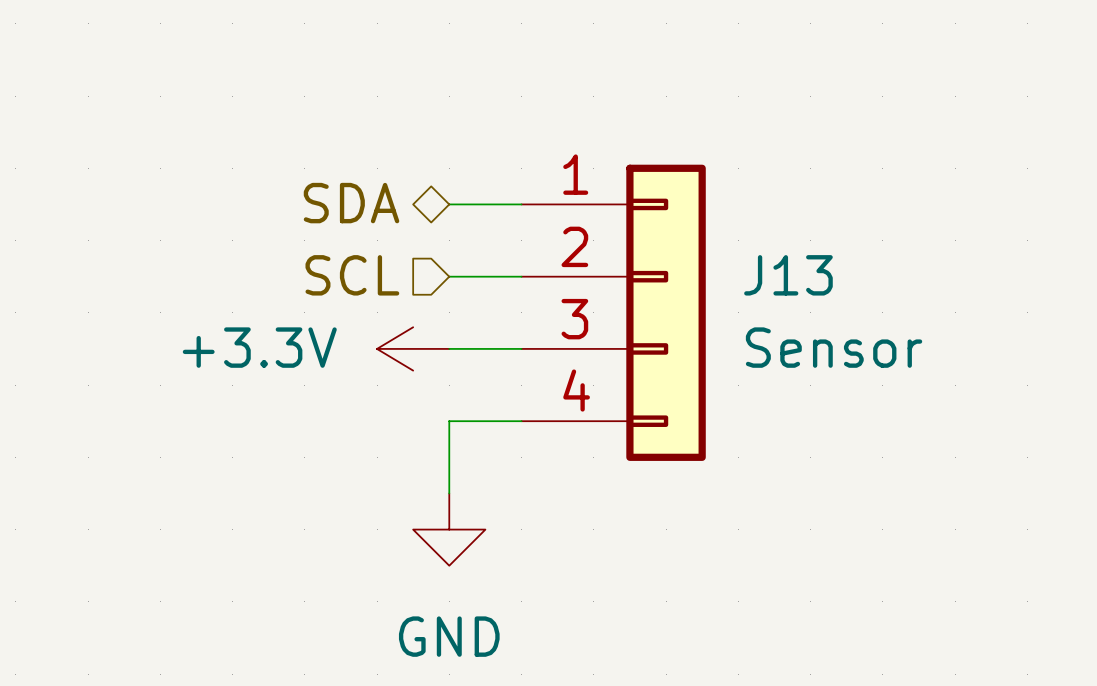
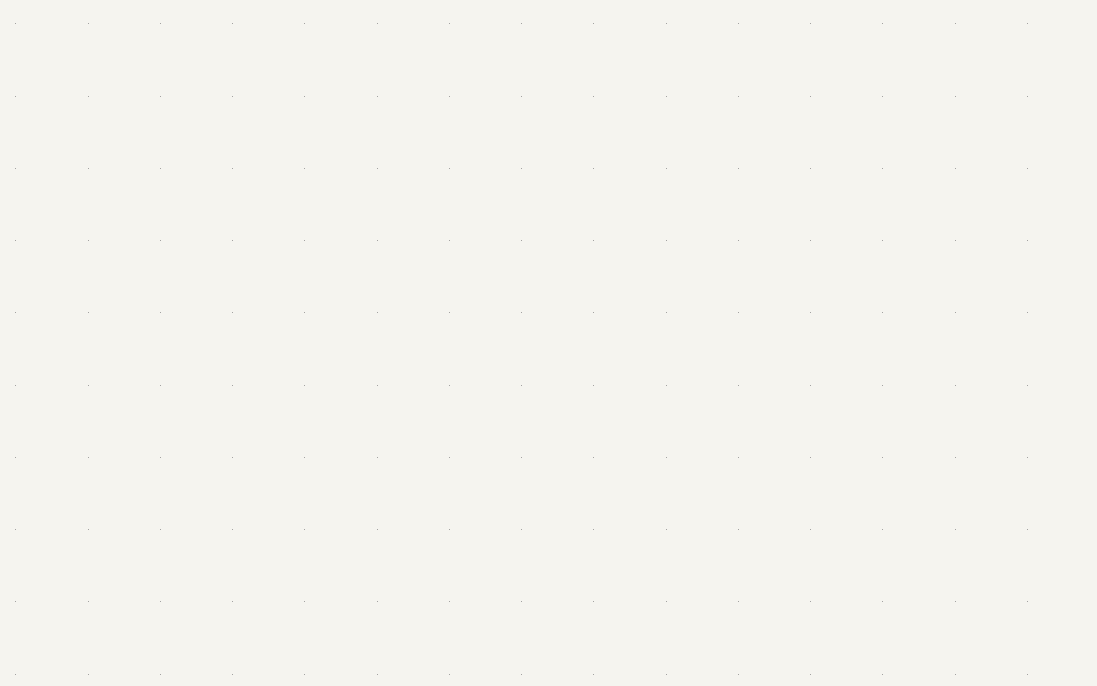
hierarchical label: SDA (351, 203) -> none
wire: (449, 204) (521, 204) -> none
hierarchical label: SCL (352, 275) -> none
wire: (449, 276) (521, 276) -> none
J13: Sensor (613, 312) -> none
power symbol: +3.3V (413, 348) -> none
wire: (449, 348) (521, 348) -> none
wire: (521, 421) (449, 421) (449, 493) -> none
power symbol: GND (449, 529) -> none

